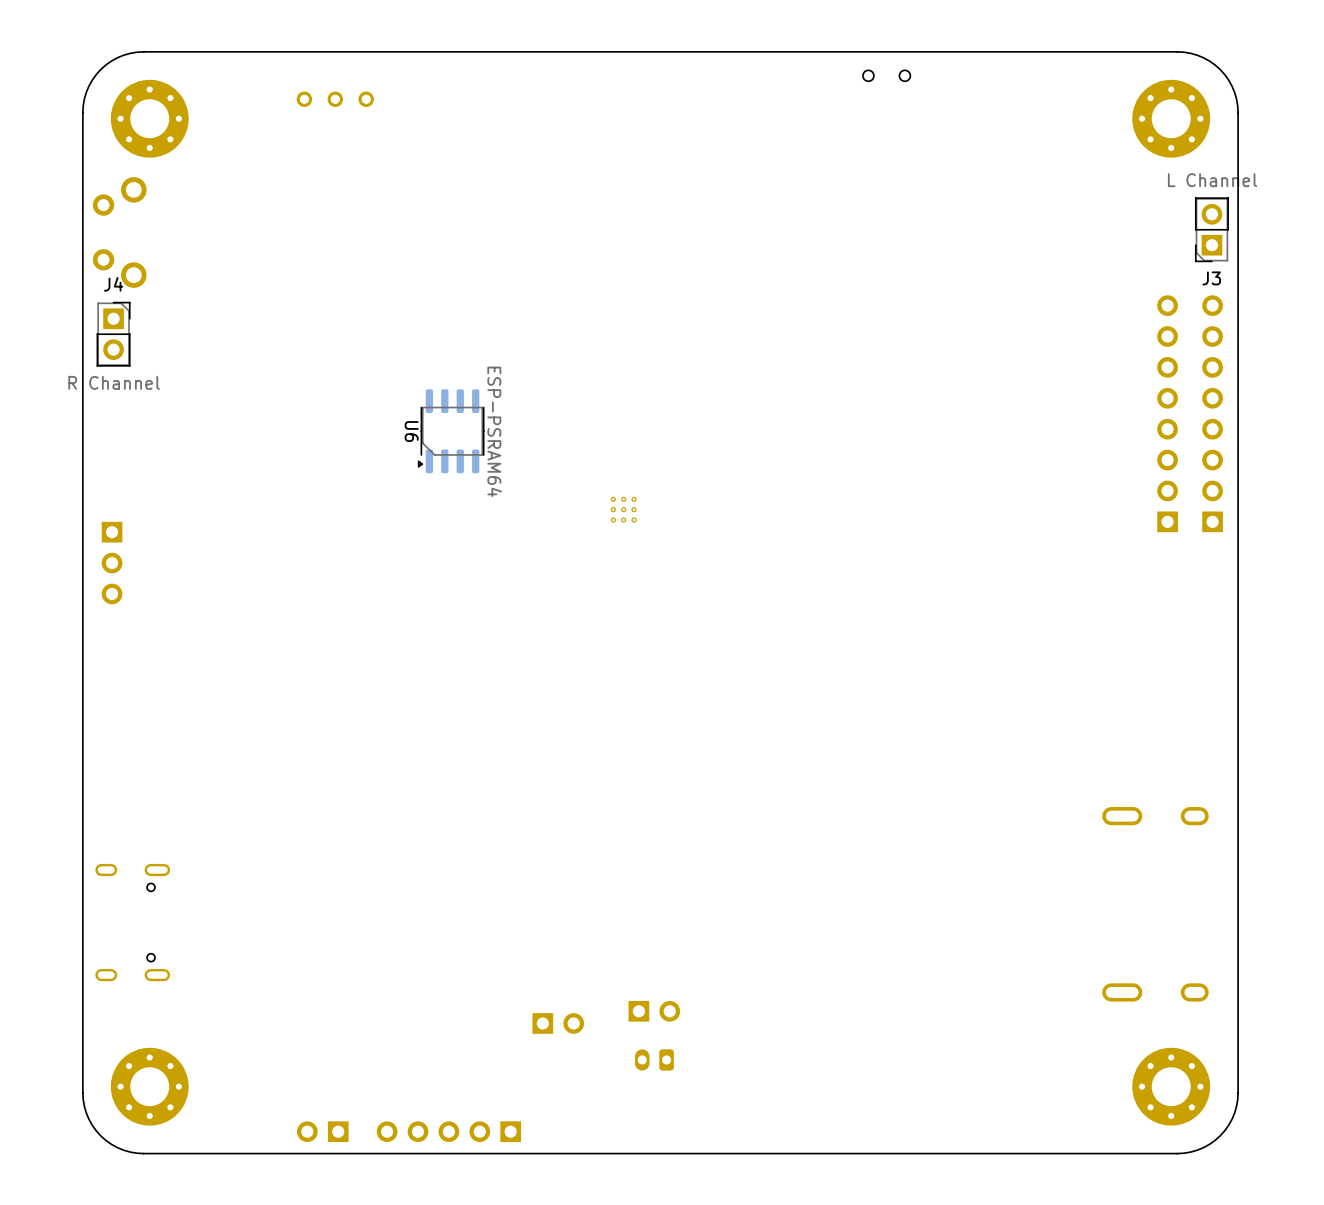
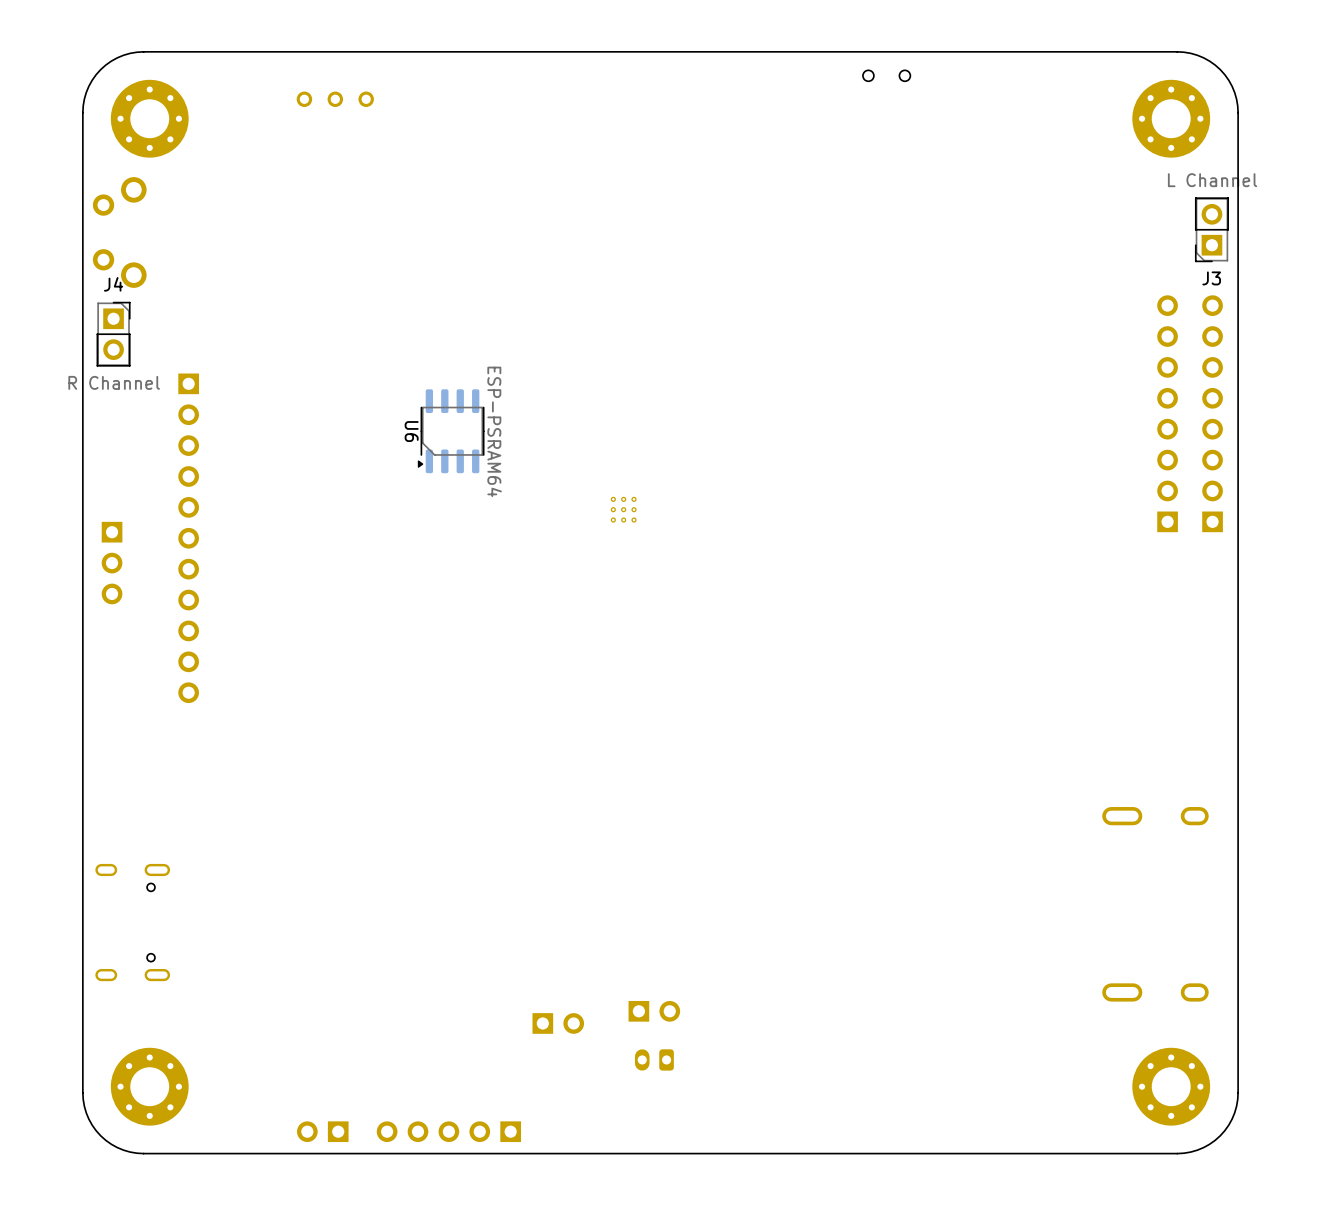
part: none -> (188, 538)

